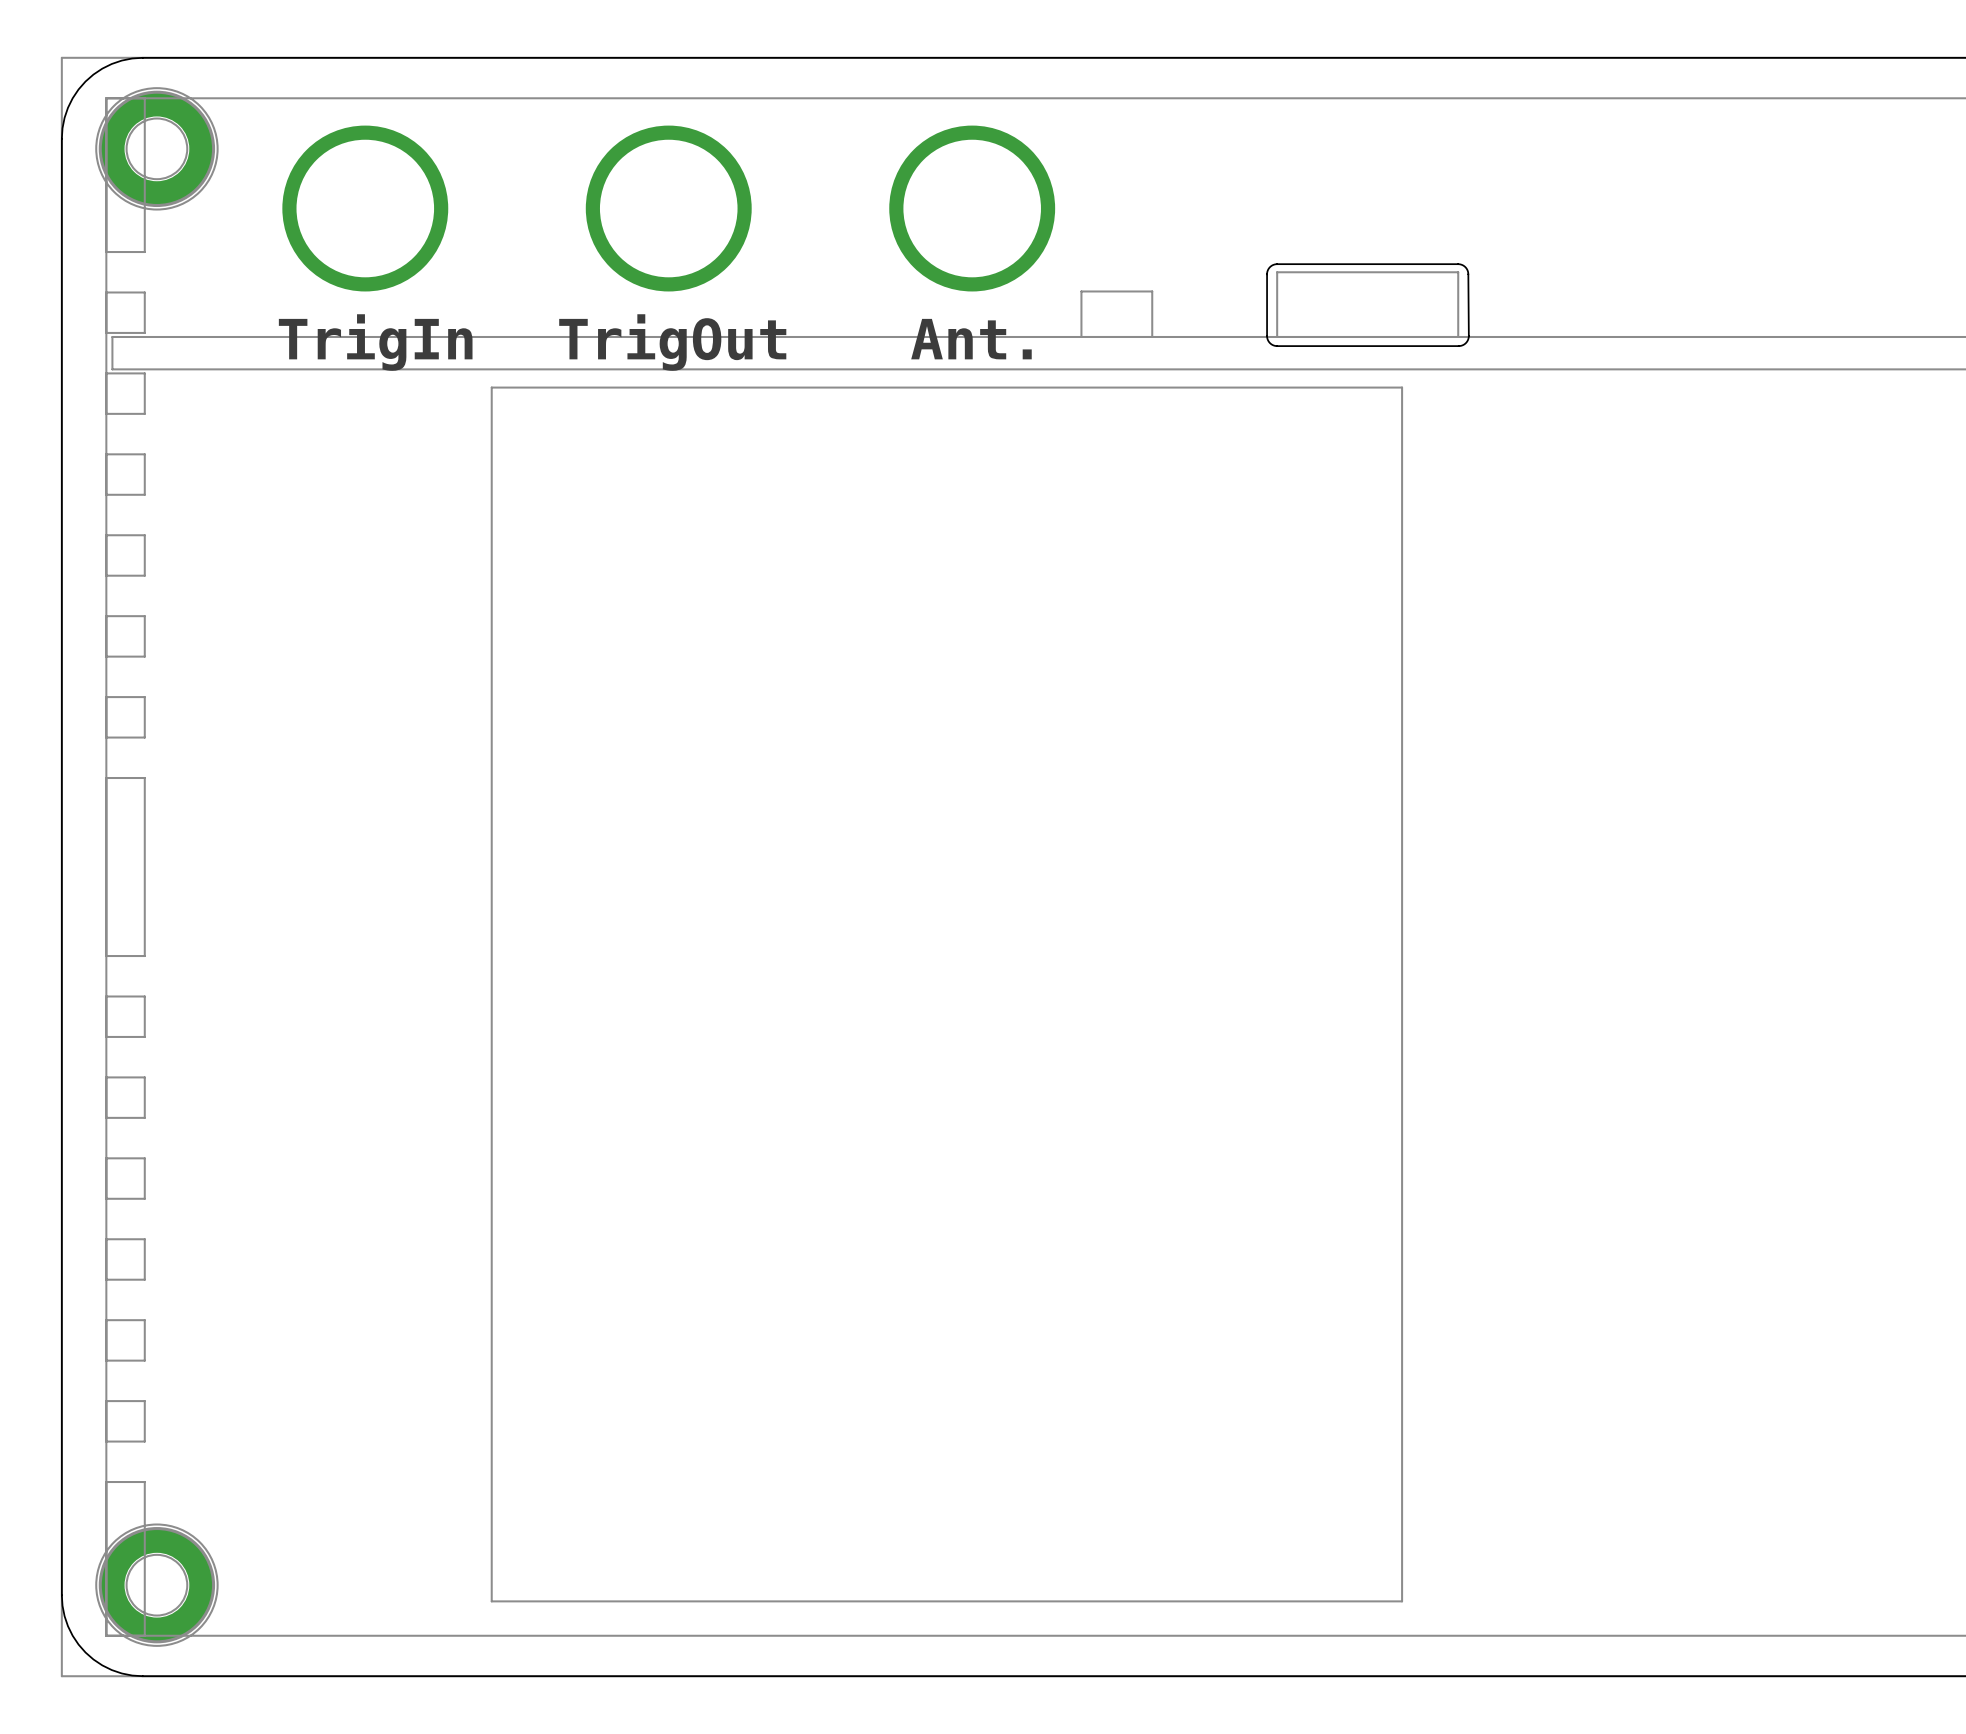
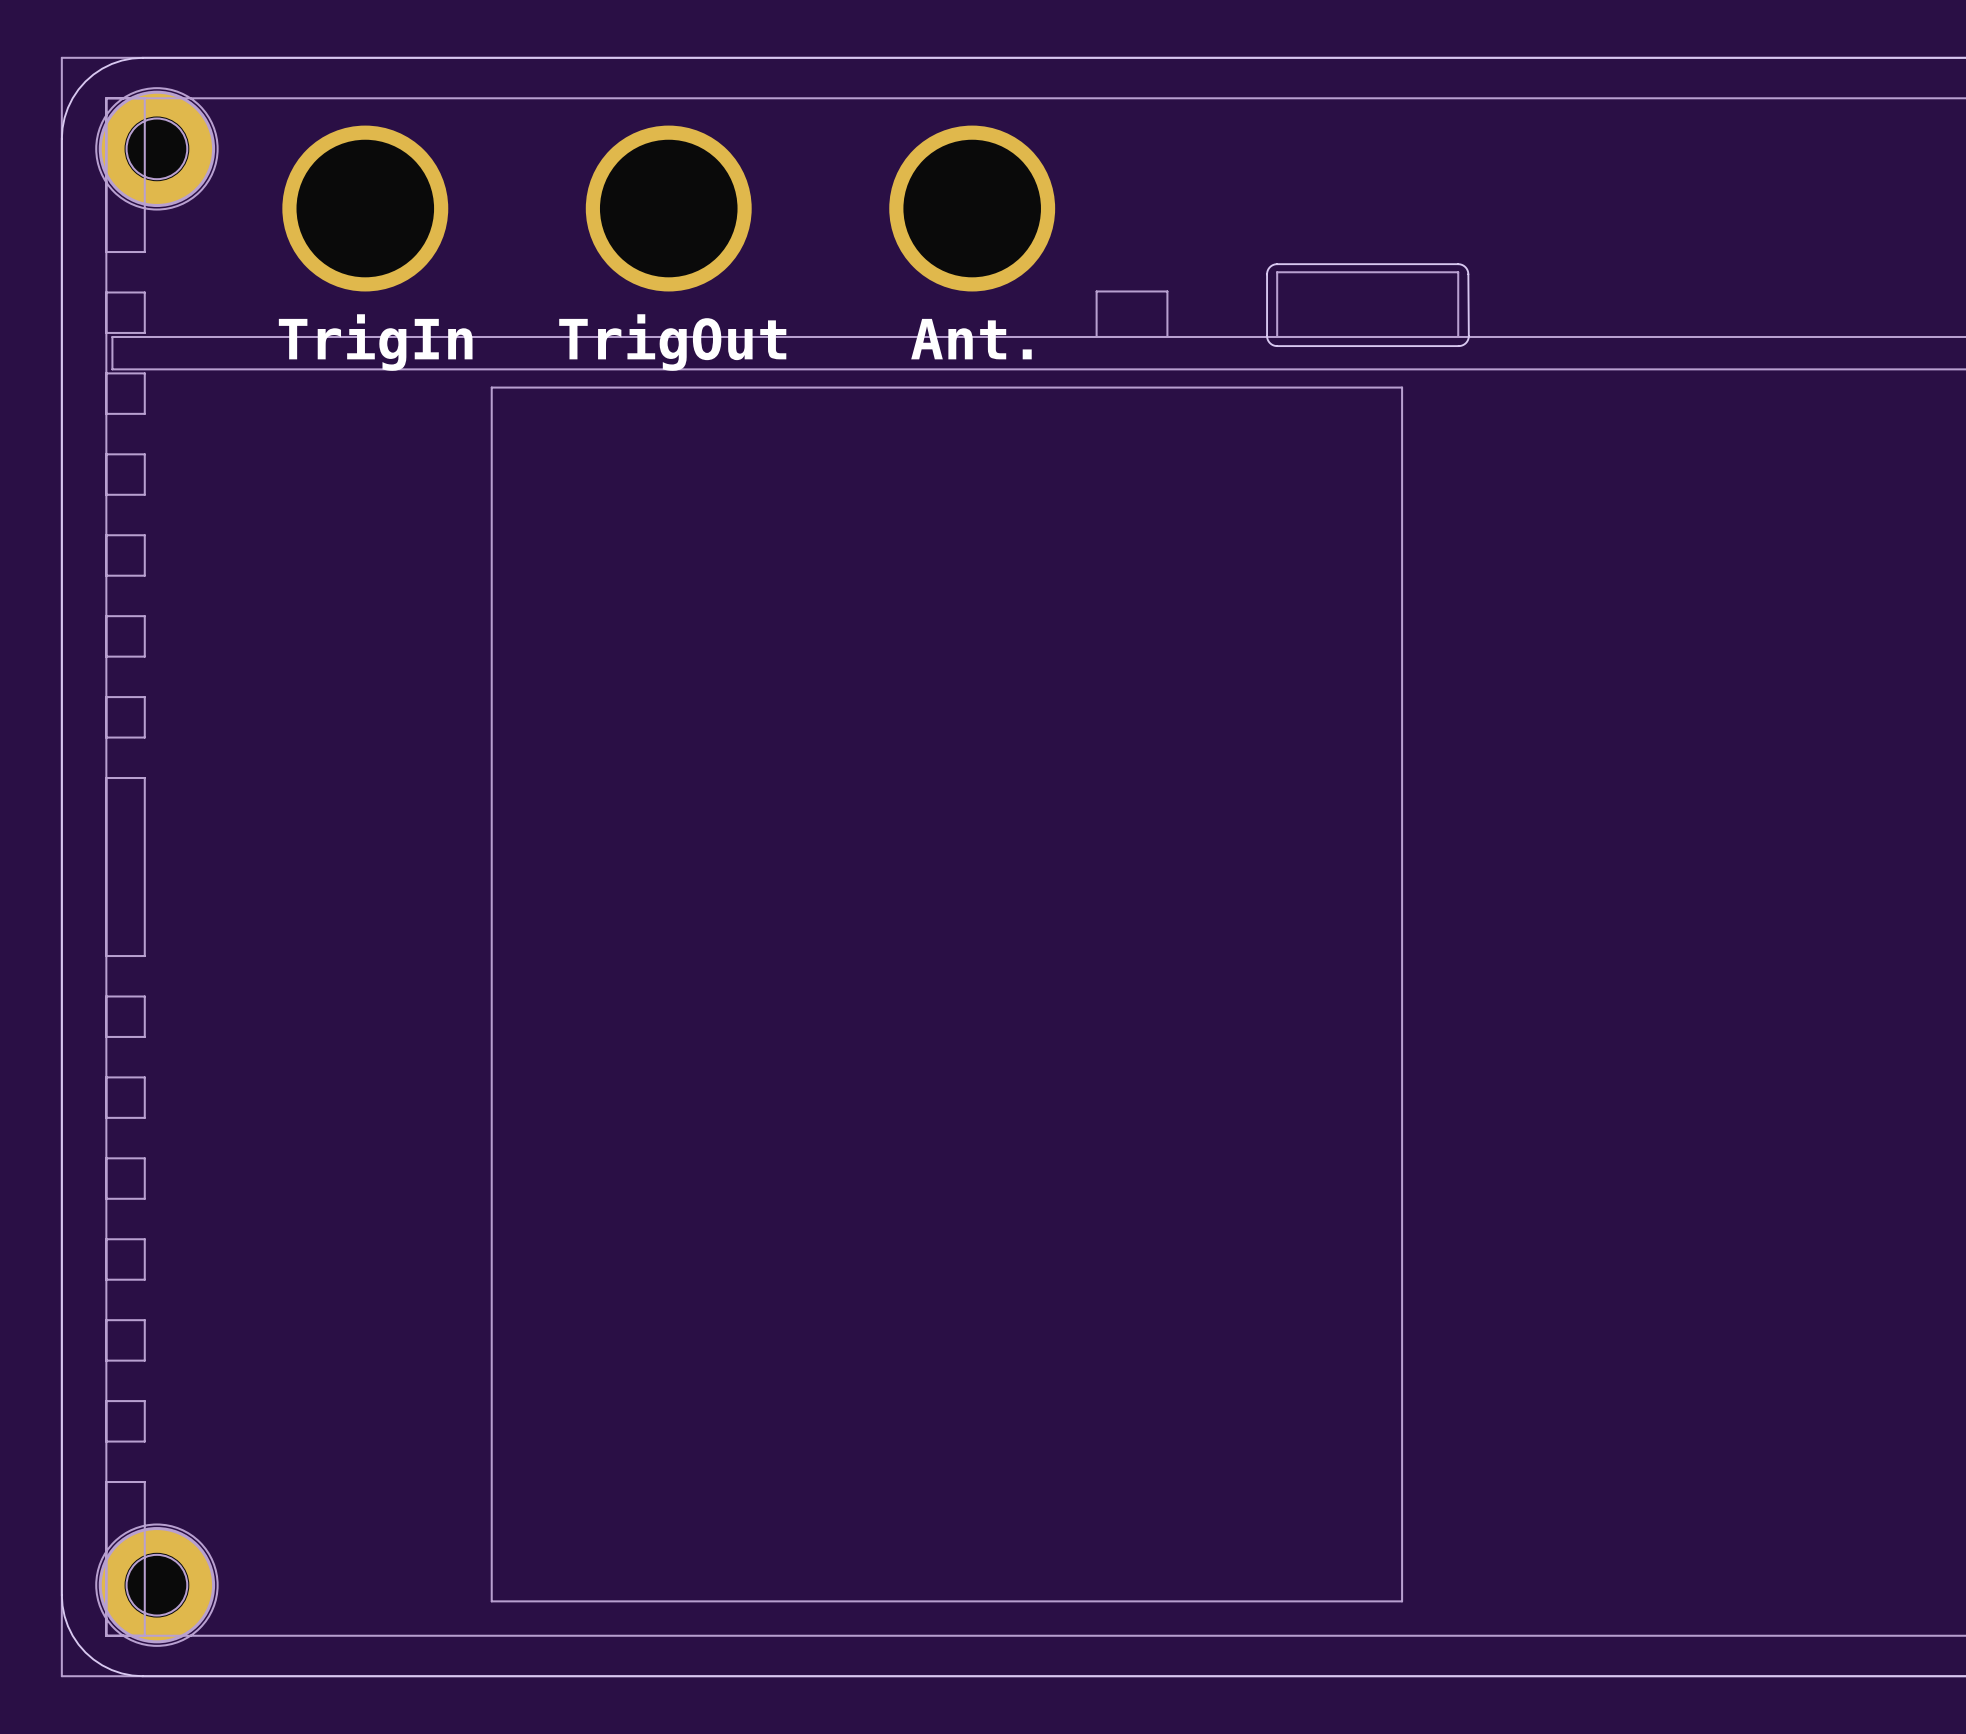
line: (1096, 291) (1081, 291) (1081, 336) -> (1096, 291) (1096, 336)
line: (1152, 291) (1152, 336) -> (1152, 291) (1167, 291) (1167, 336)

